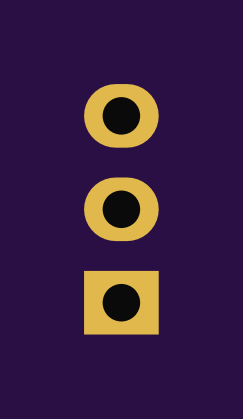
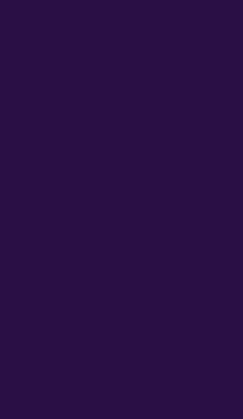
part: (121, 209) -> none

